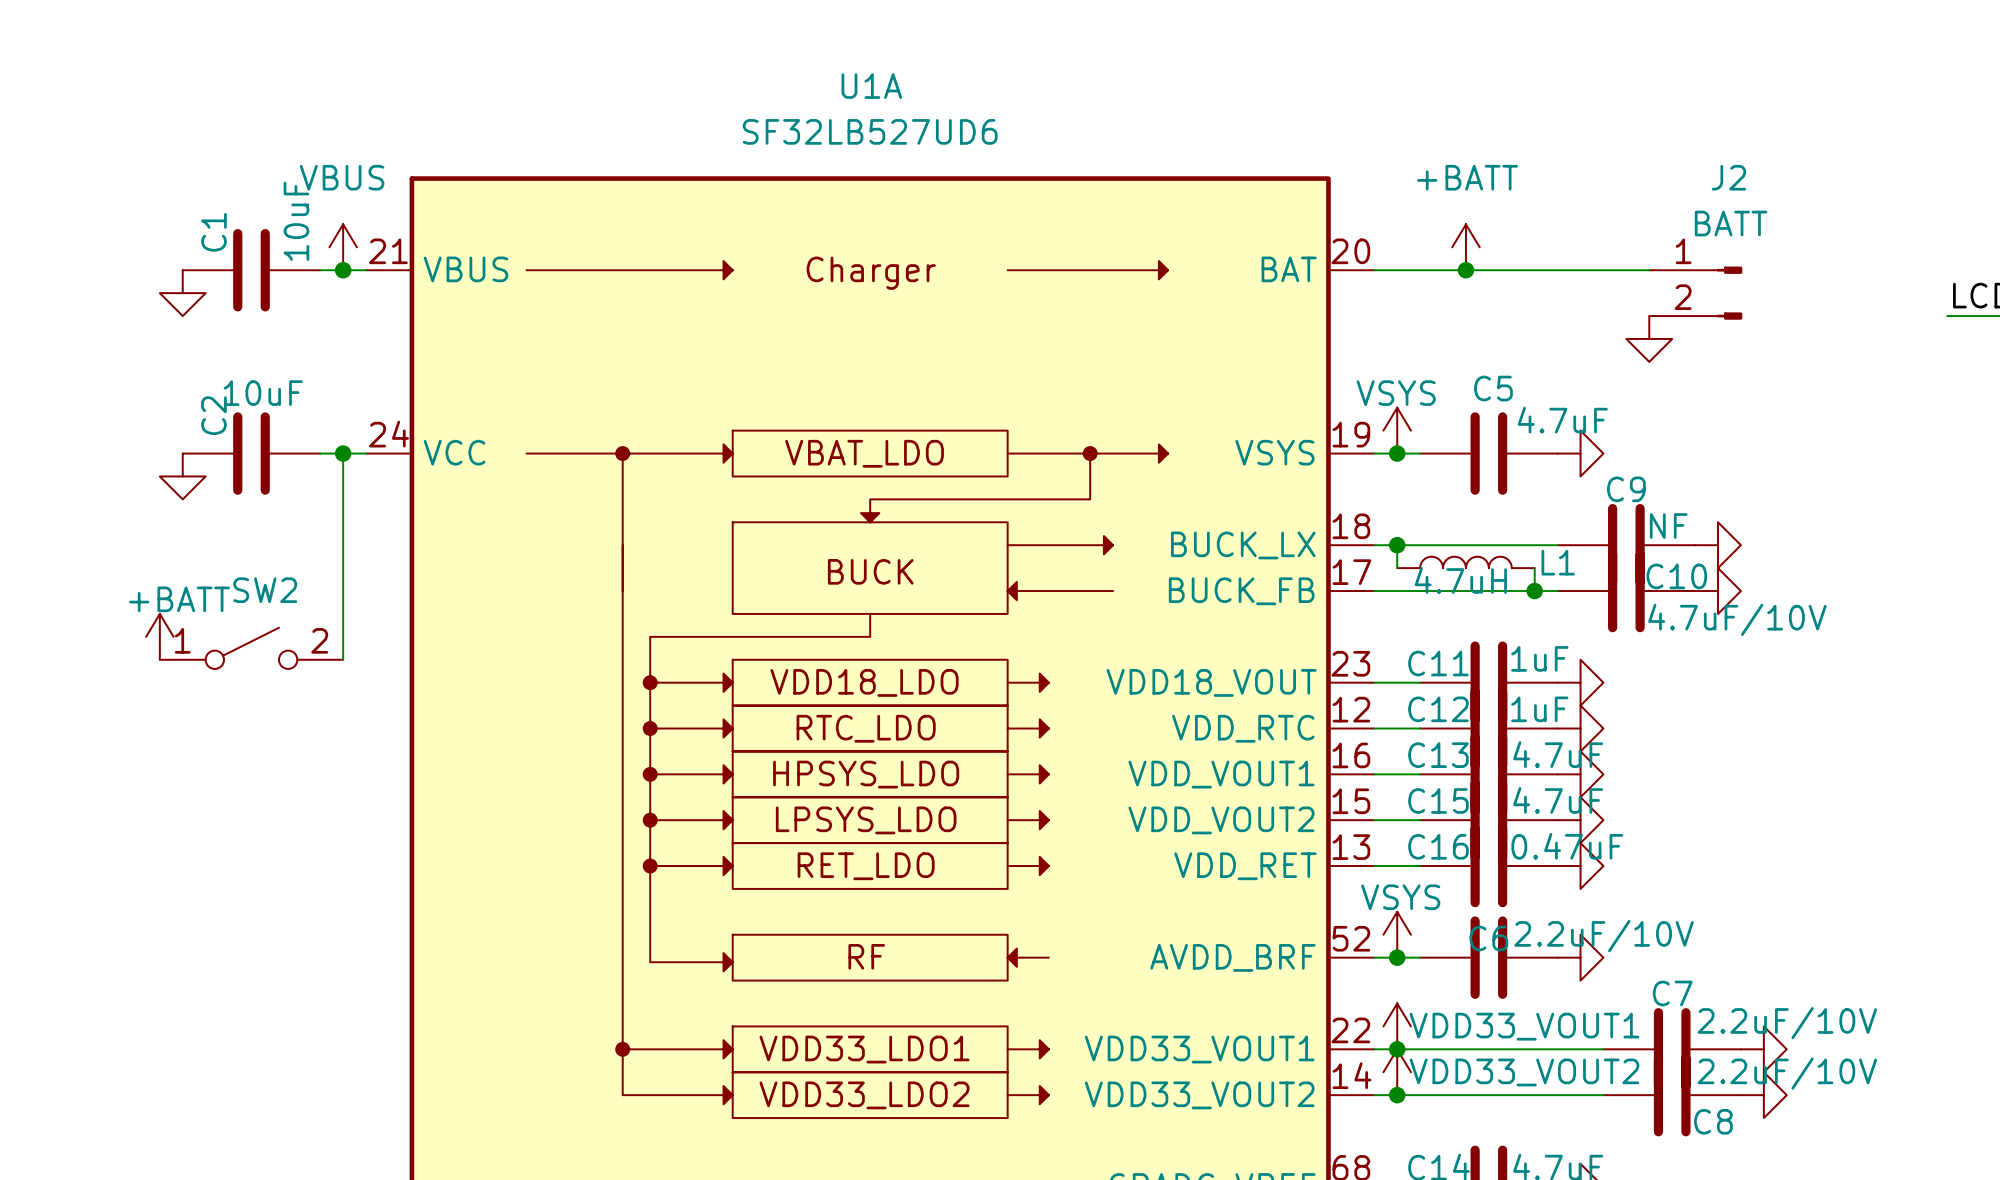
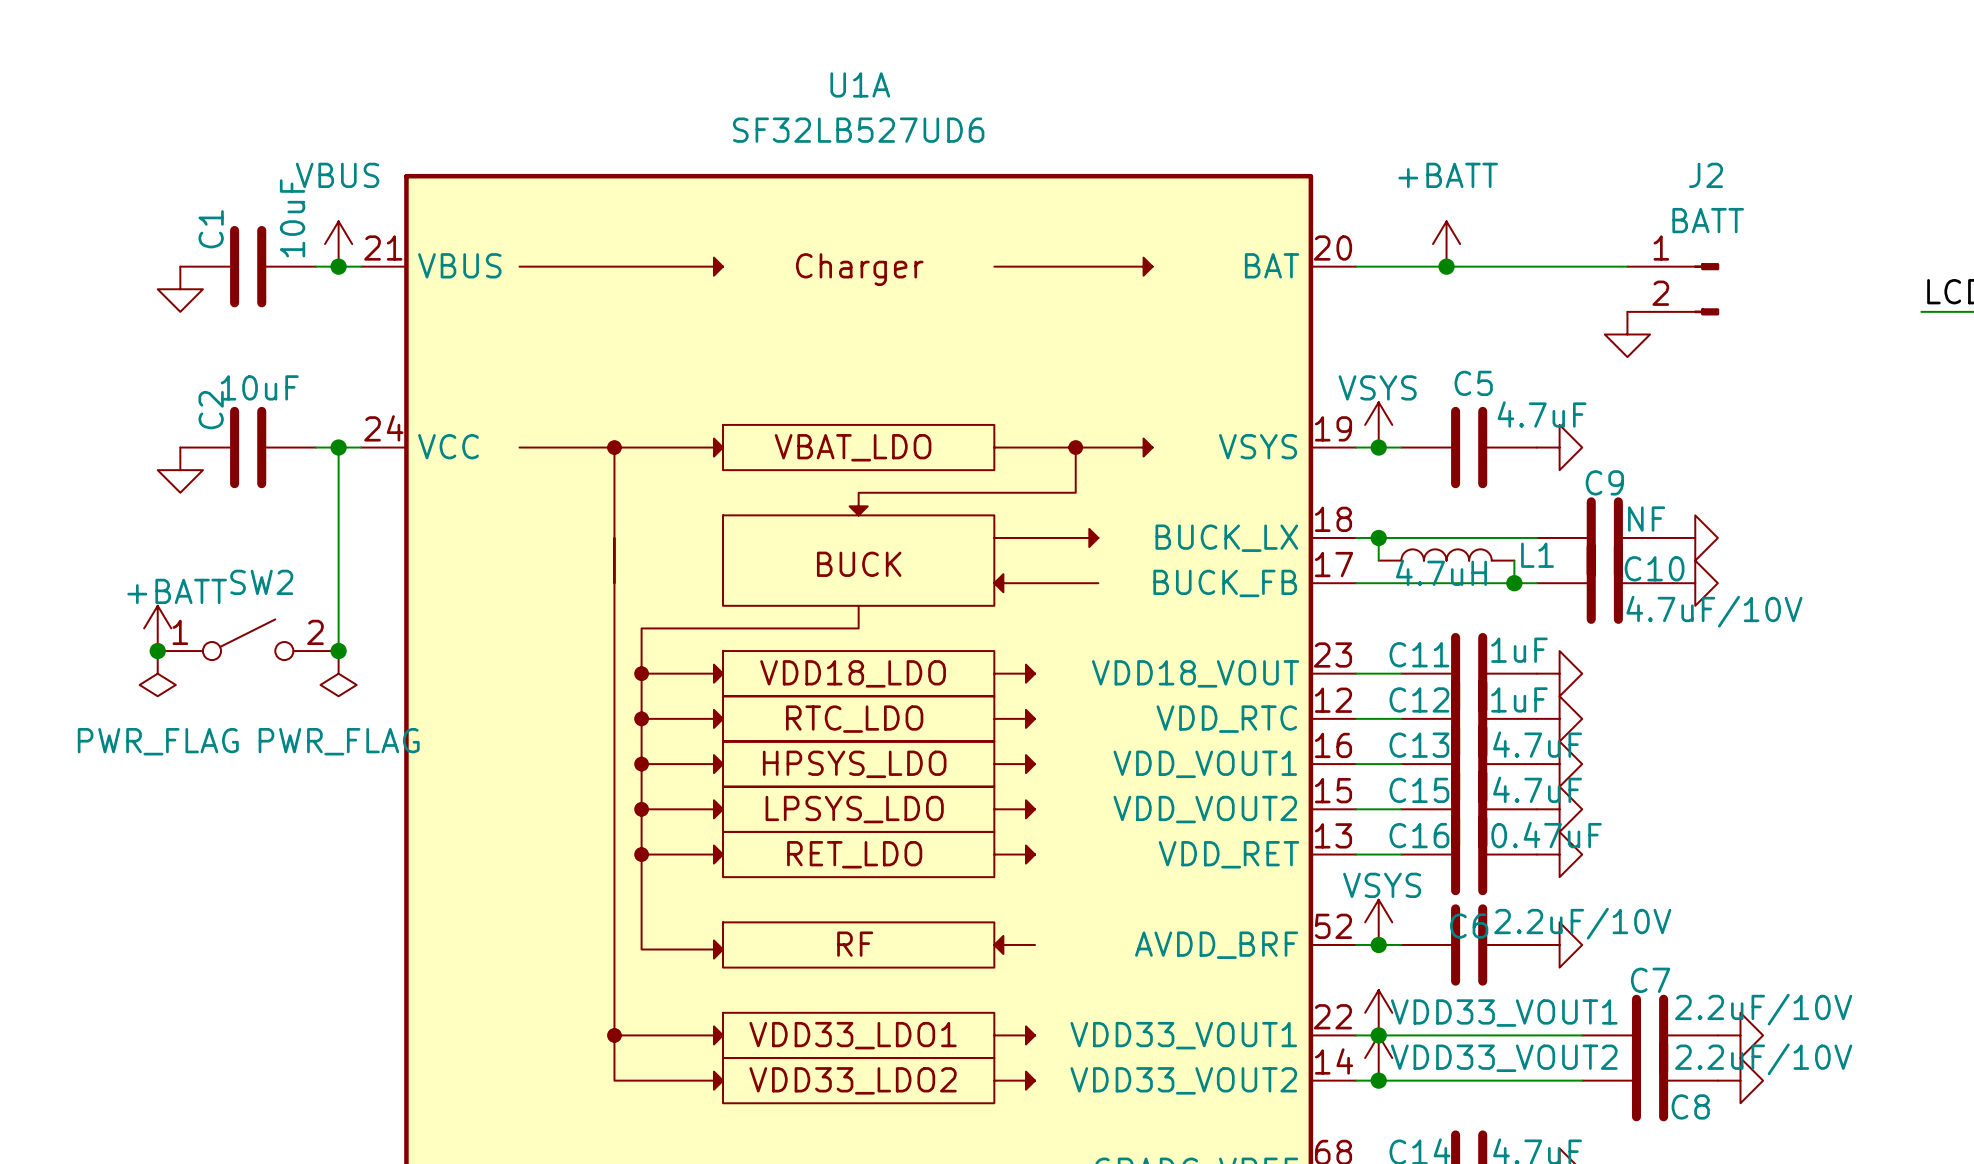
junction: none -> (157, 651)
junction: none -> (338, 651)
power symbol: none -> PWR_FLAG (157, 673)
power symbol: none -> PWR_FLAG (338, 673)

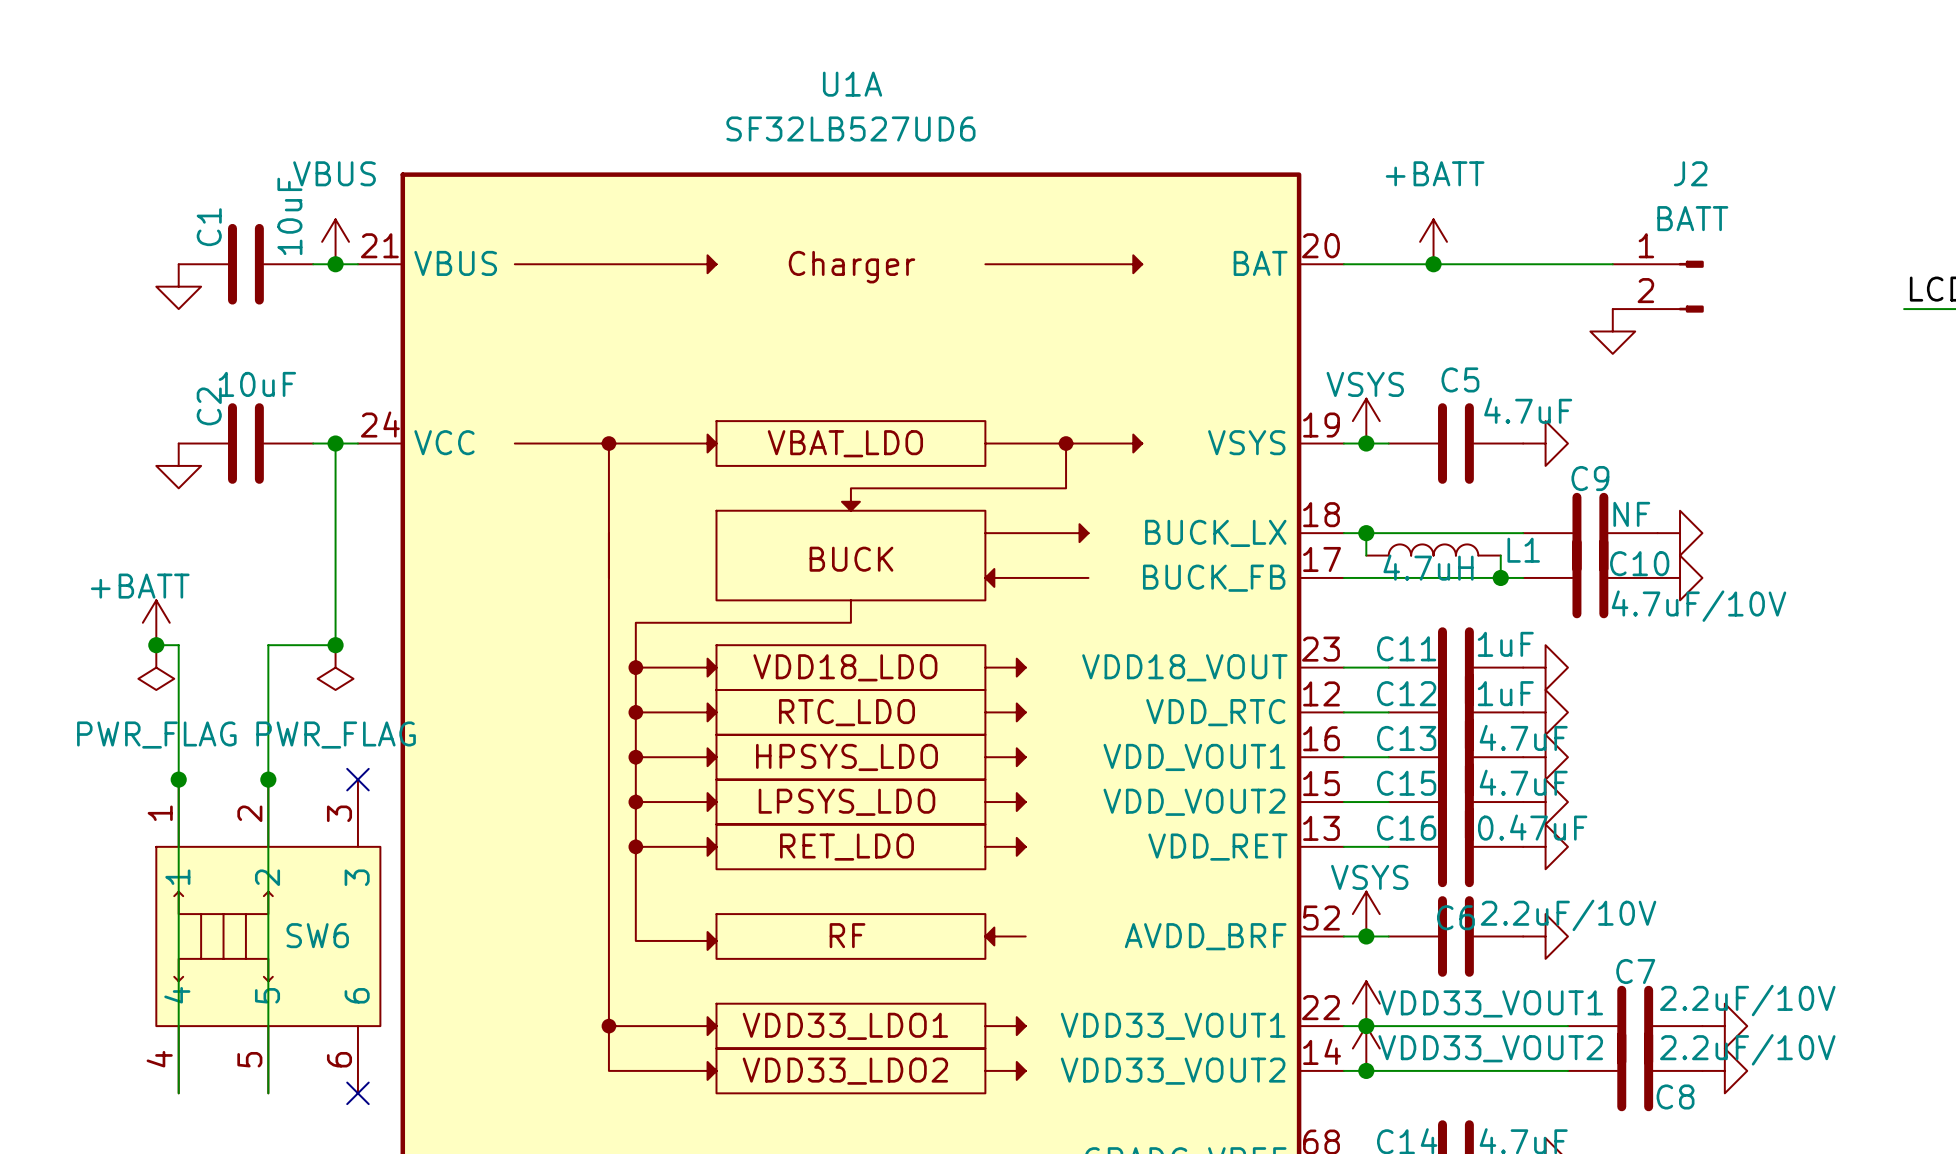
power symbol text position: +BATT (177, 591) -> +BATT (140, 586)
SW2: (248, 639) -> none
wire: none -> (156, 645) (178, 645) (178, 1093)
wire: none -> (335, 645) (268, 645) (268, 1093)
junction: none -> (178, 779)
junction: none -> (268, 779)
no-connect mark: none -> (357, 779)
SW6: none -> (268, 936)
no-connect mark: none -> (357, 1093)

